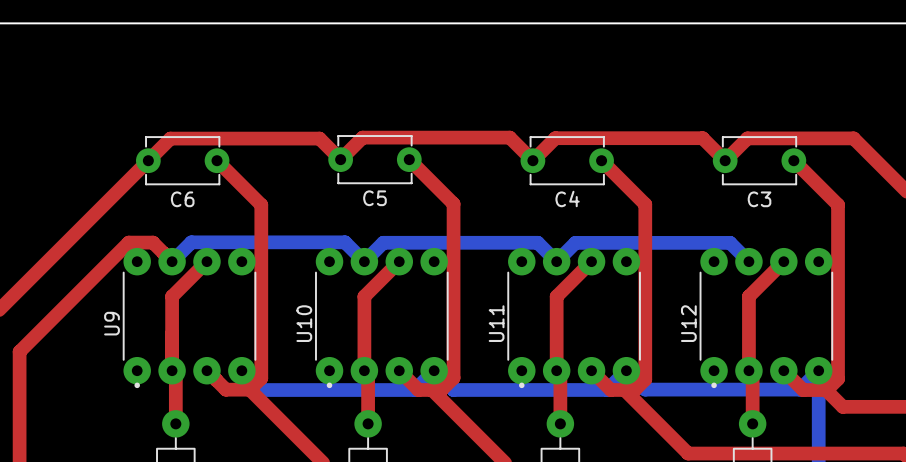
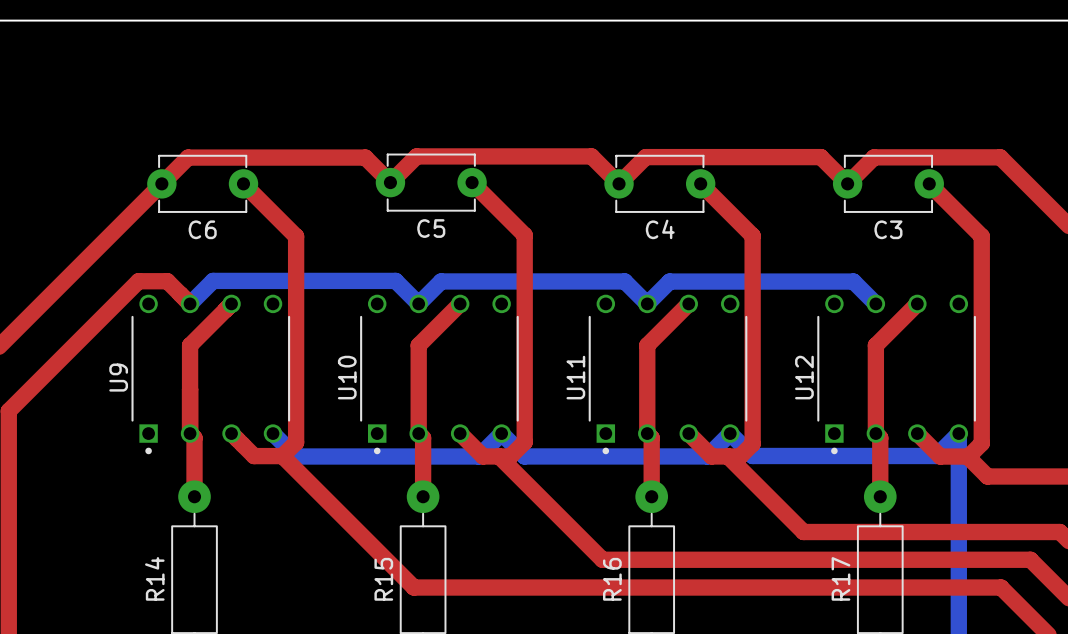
U9 footprint: [122, 247, 257, 389] -> [131, 294, 291, 455]
U10 footprint: [315, 247, 449, 389] -> [360, 294, 519, 455]
U11 footprint: [507, 247, 641, 389] -> [588, 294, 748, 455]
U12 footprint: [699, 247, 834, 389] -> [817, 294, 976, 455]

